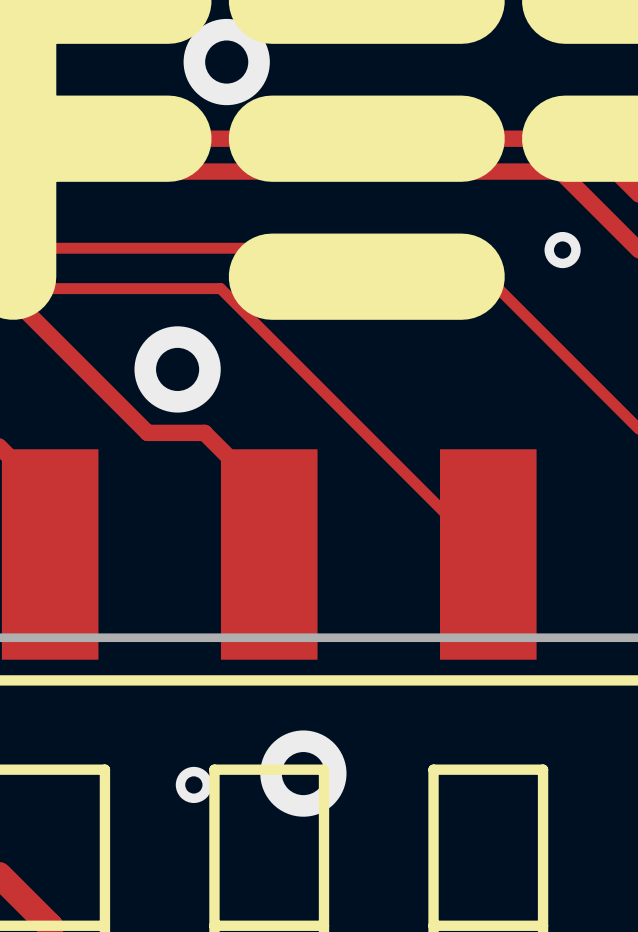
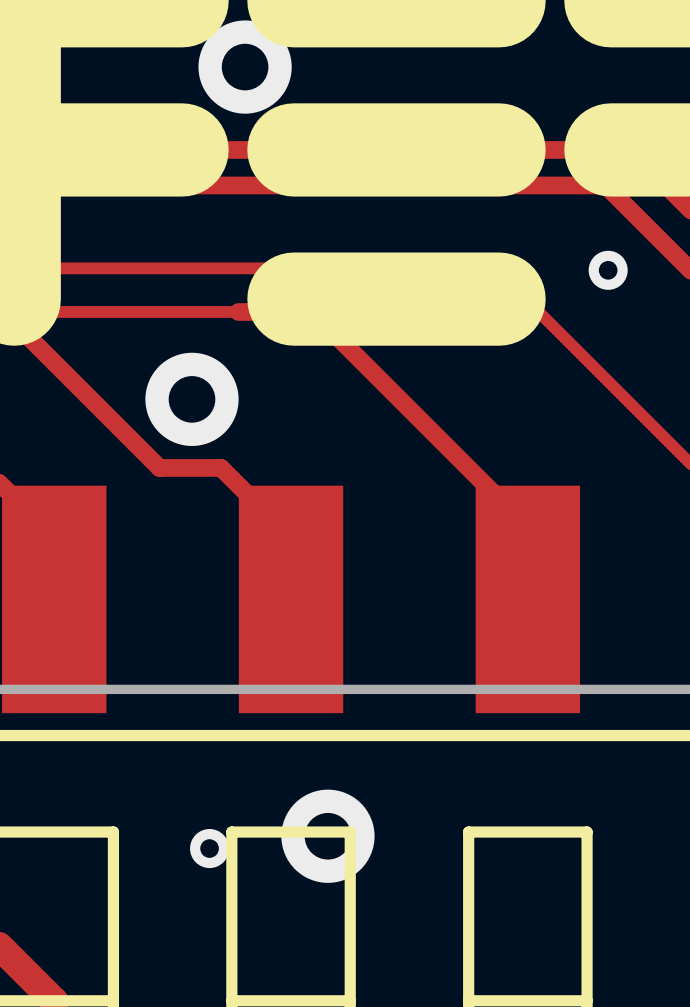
track: (220, 288) (485, 553) -> (238, 311) (312, 311) (525, 524) (525, 598)

